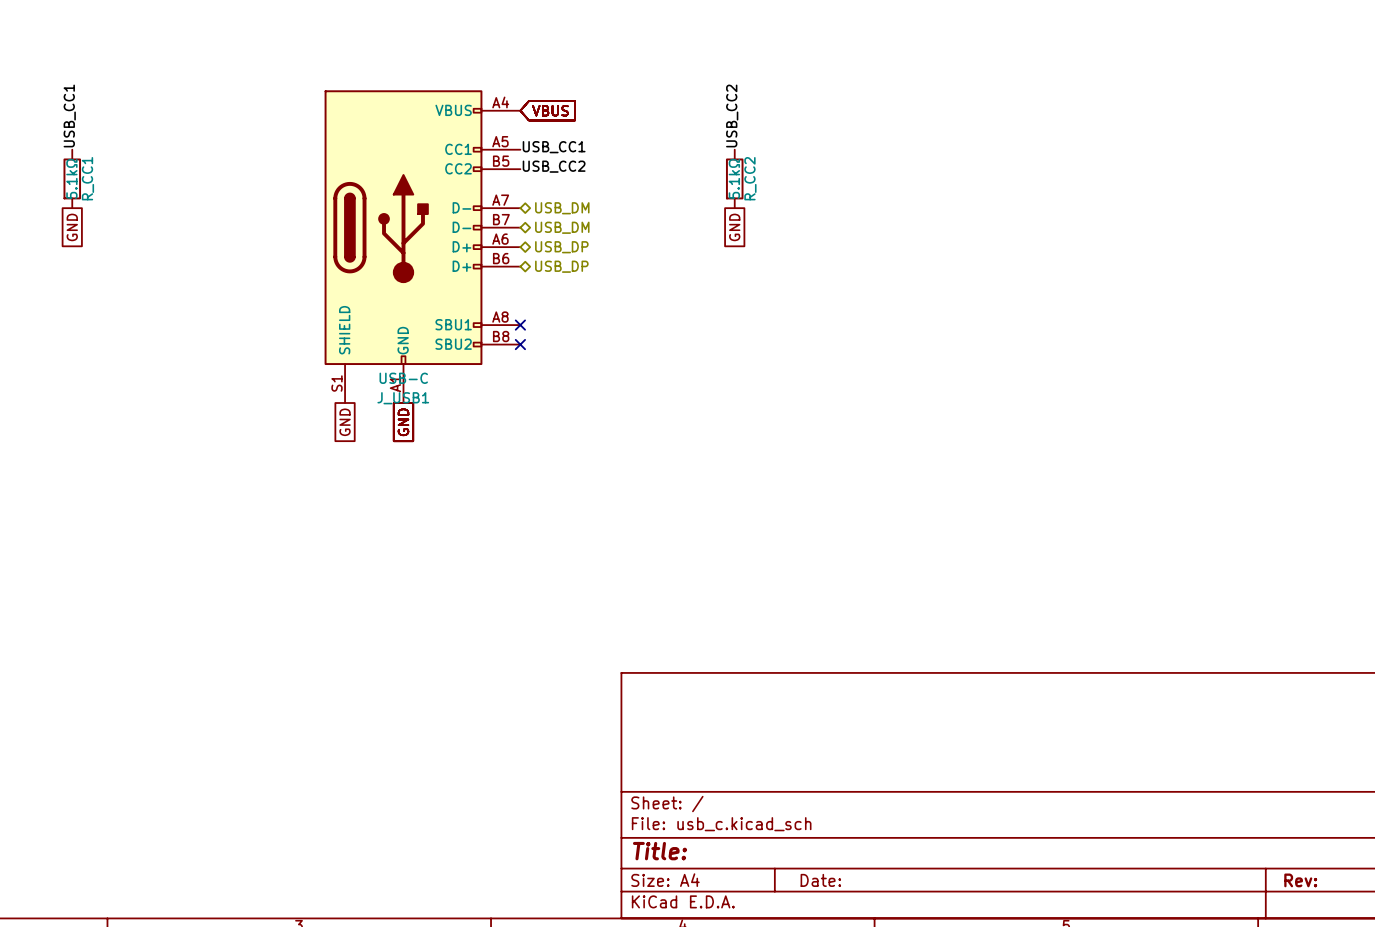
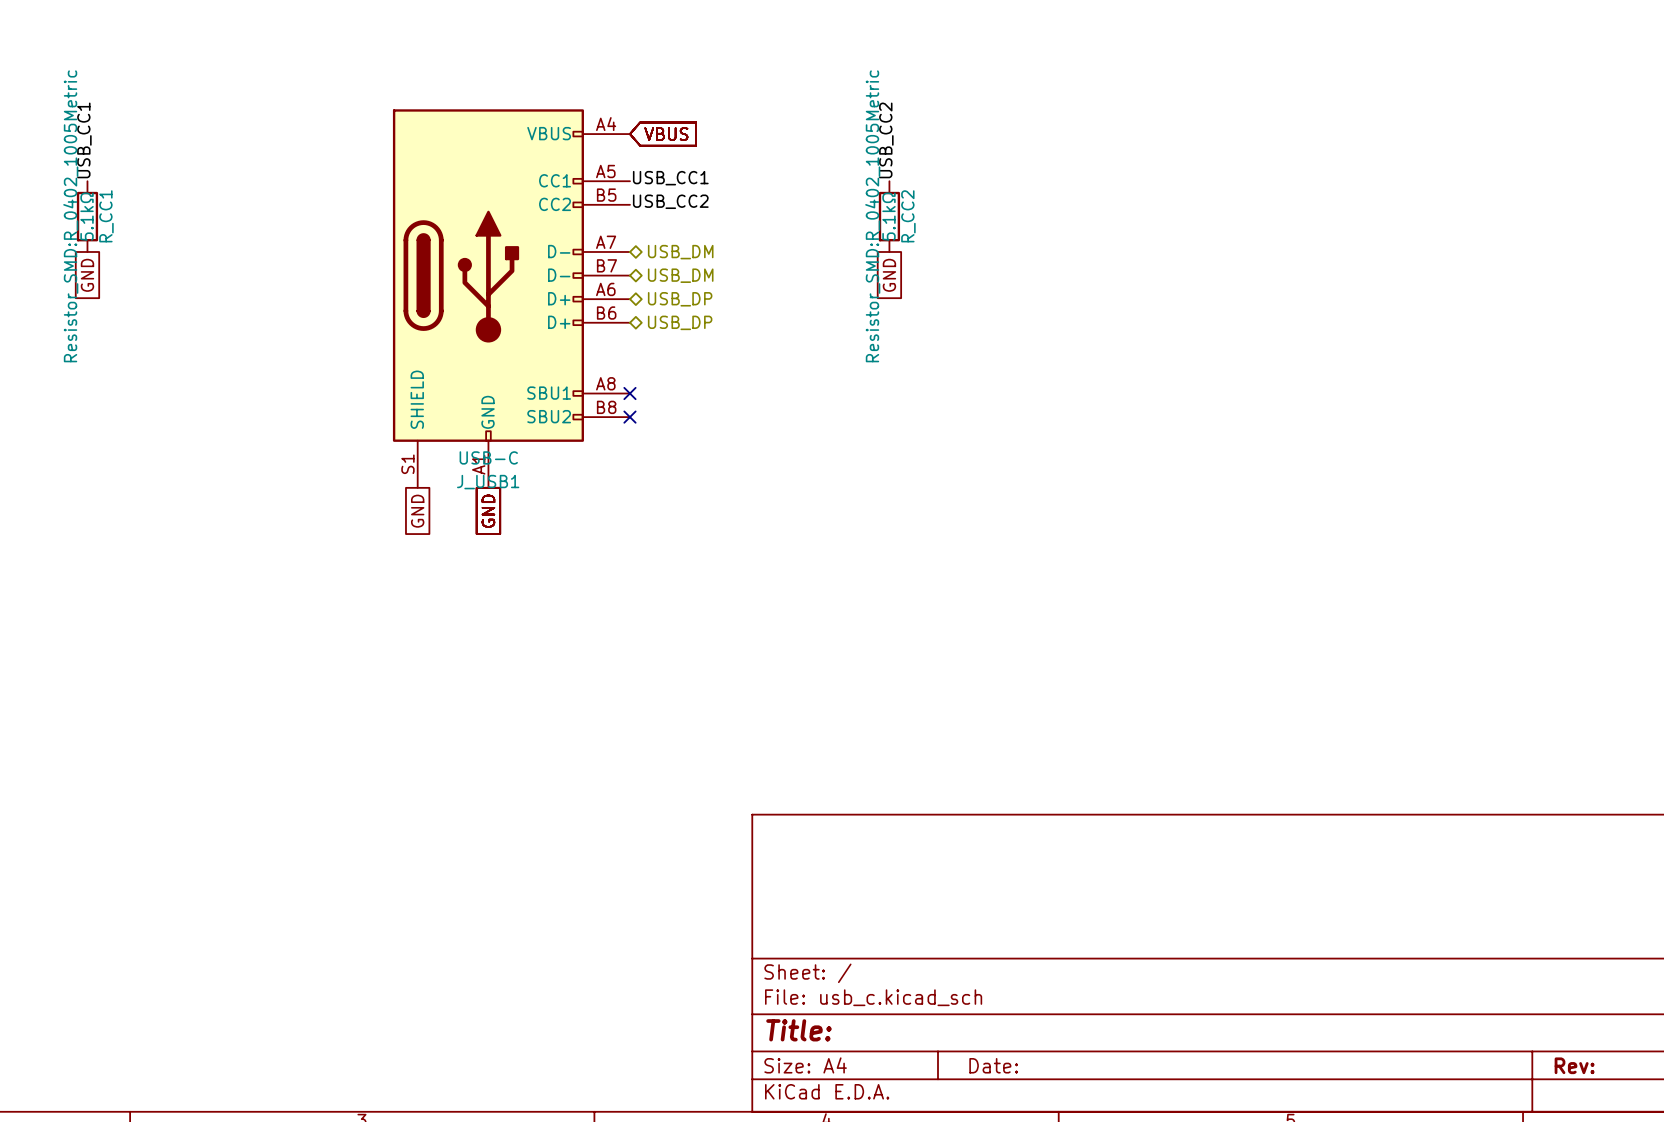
R_CC1 text: none -> Resistor_SMD:R_0402_1005Metric (70, 216)
R_CC2 text: none -> Resistor_SMD:R_0402_1005Metric (872, 216)

